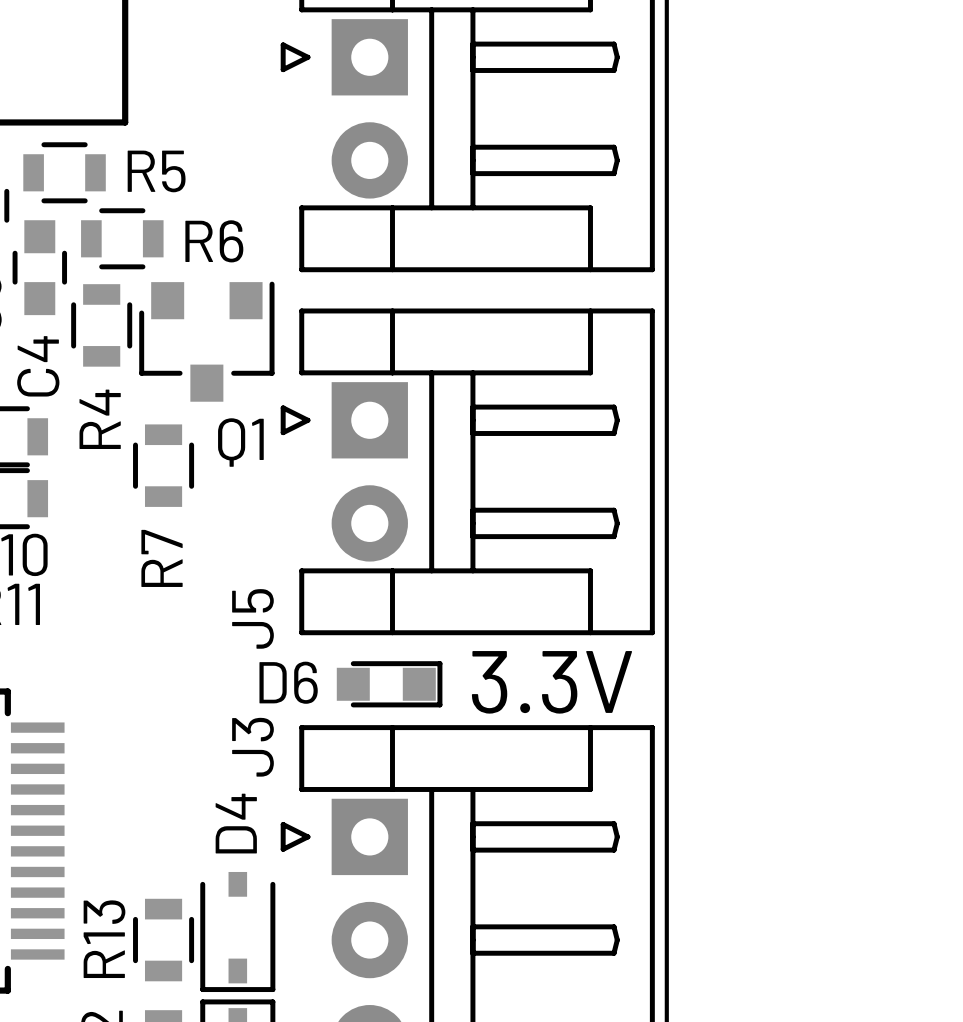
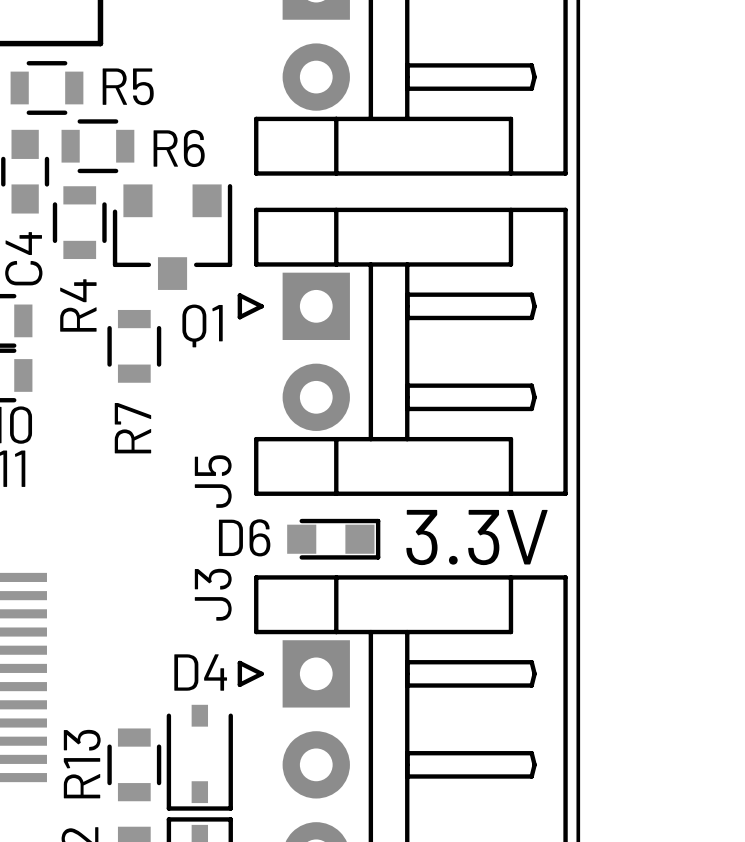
D4 name rotation: 0° (236, 823) -> 90° clockwise (200, 672)

